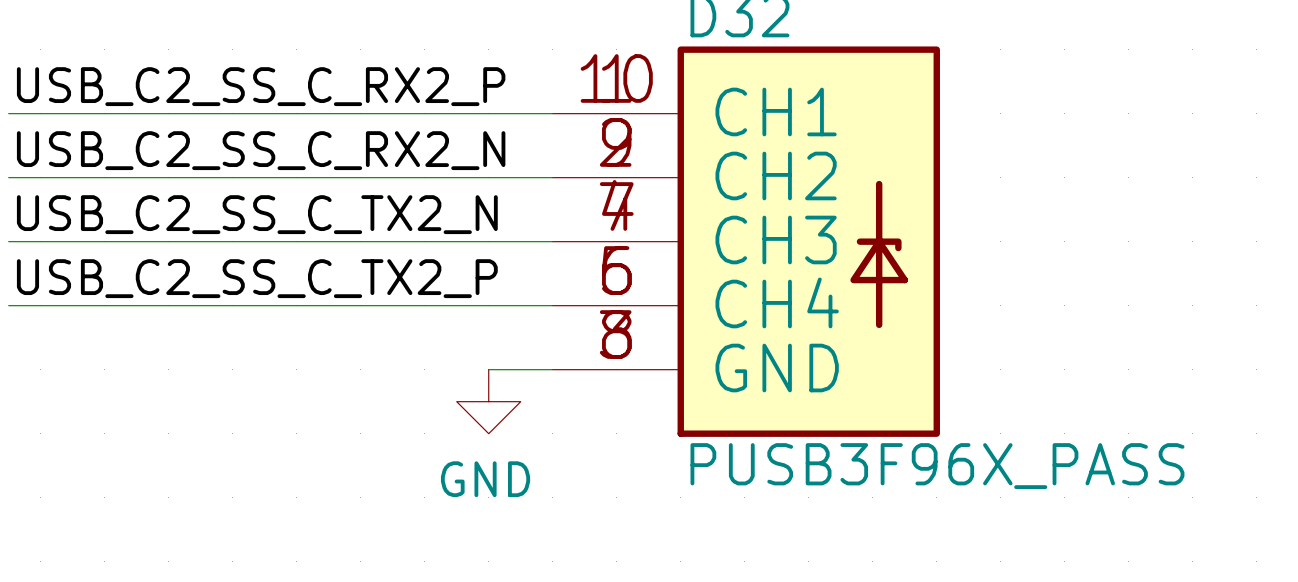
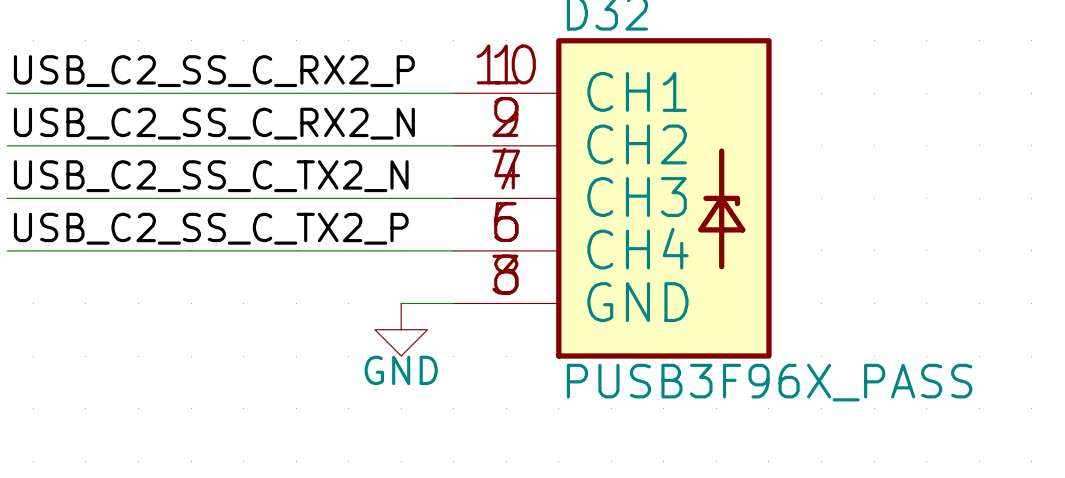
power symbol text position: GND (485, 479) -> GND (401, 370)

